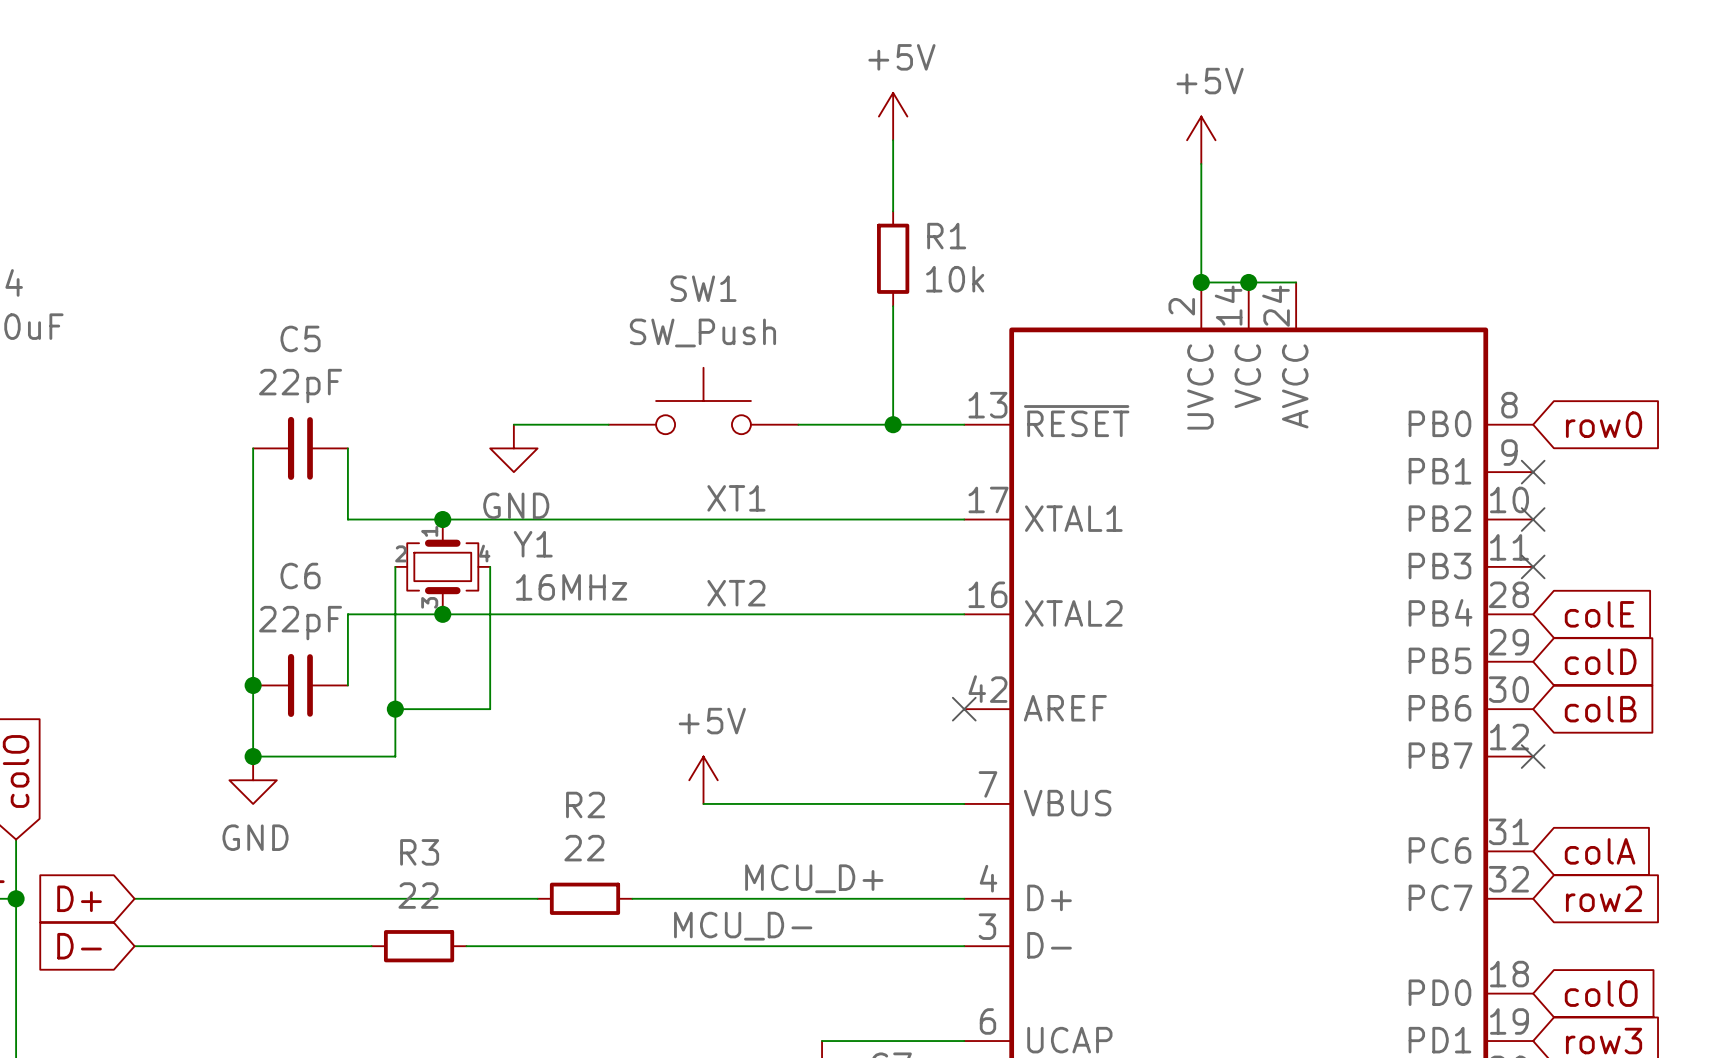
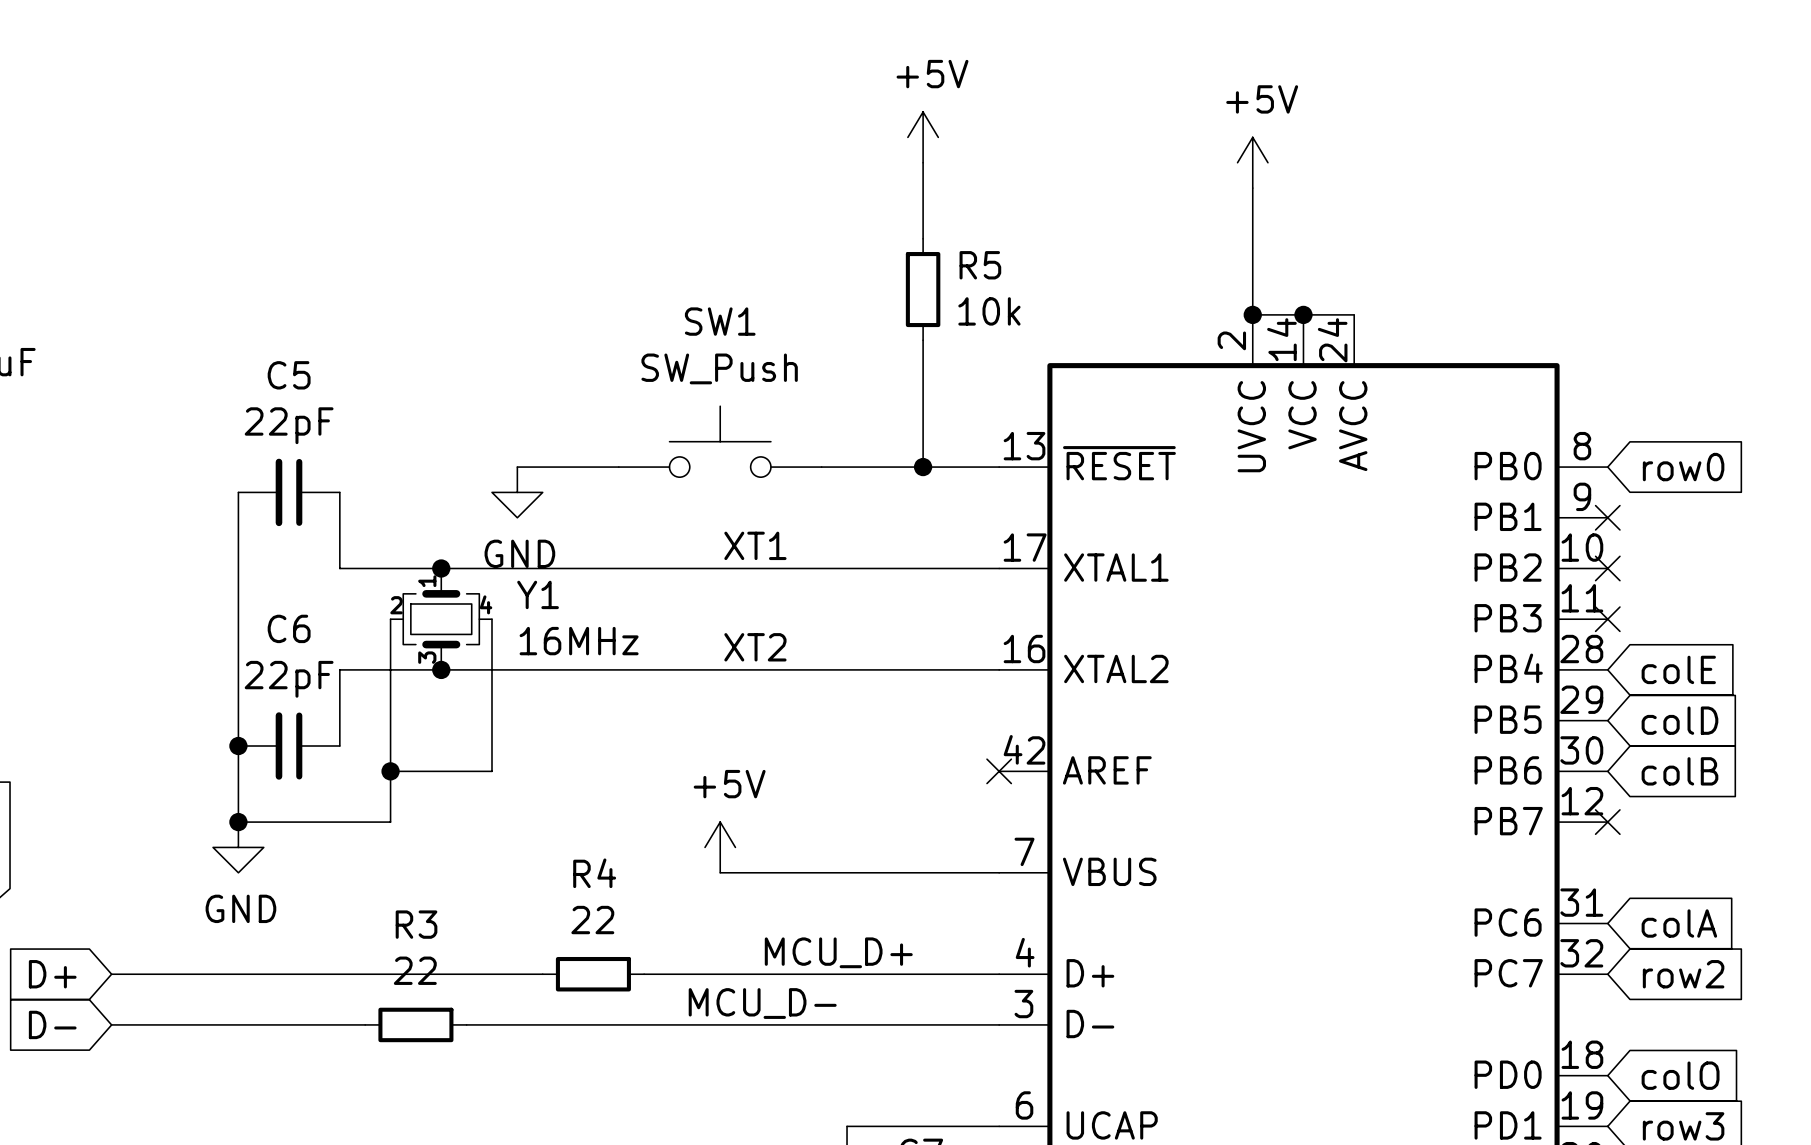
R1 name: R1 (946, 236) -> R5 (980, 265)
R2 name: R2 (585, 804) -> R4 (594, 873)

